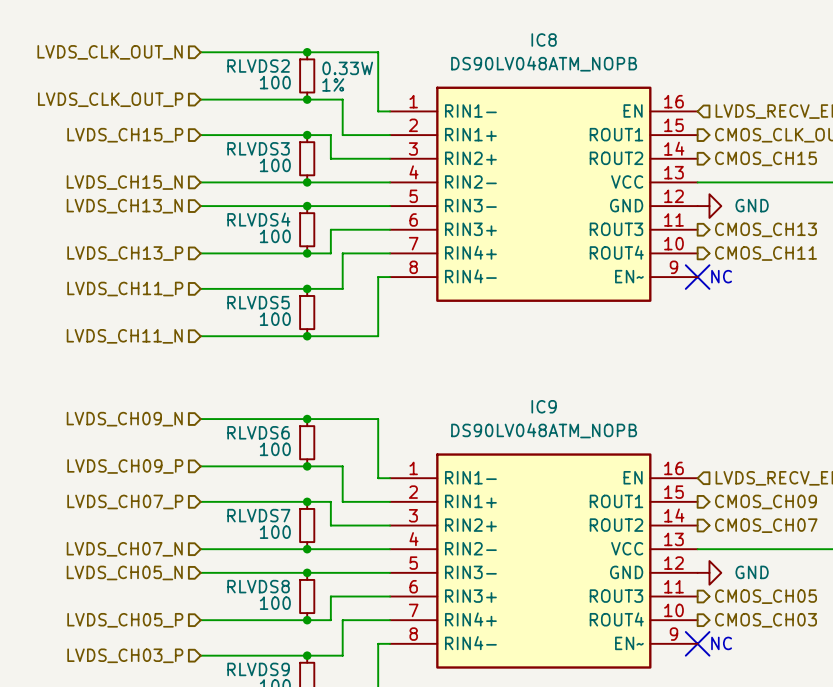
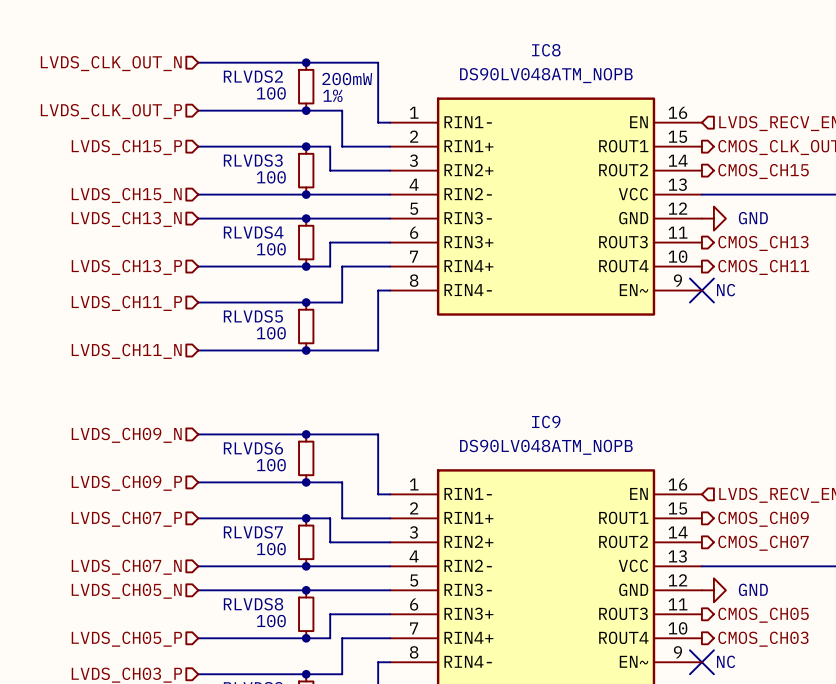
RLVDS2 text: 0.33W (347, 68) -> 200mW (347, 79)

